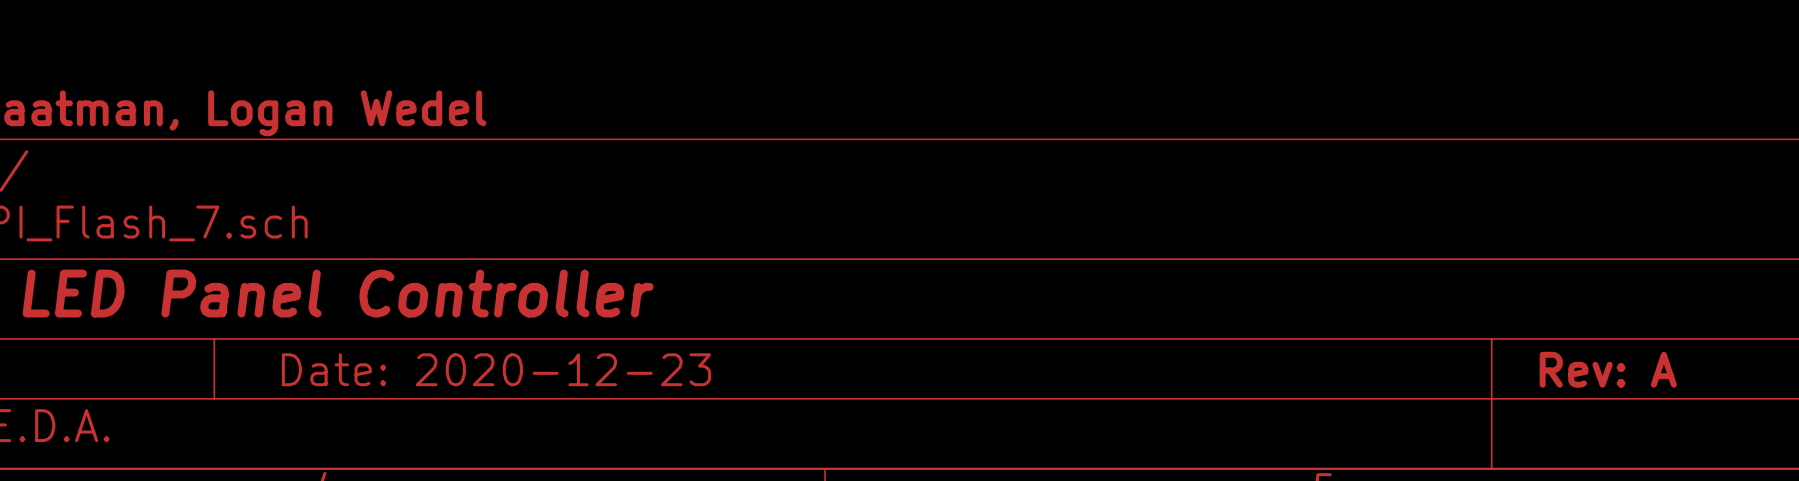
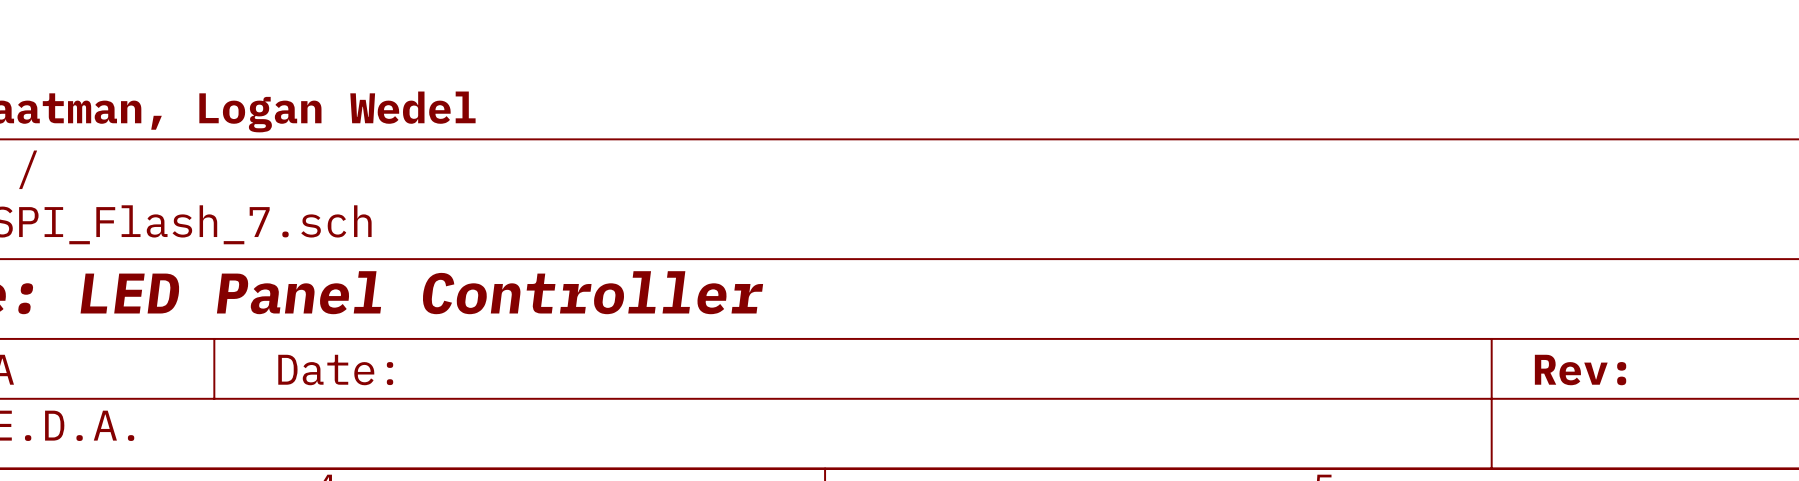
title block: Date: 2020-12-23 (496, 369) -> Date: (335, 370)
title block: Rev: A (1608, 369) -> Rev: (1580, 370)

